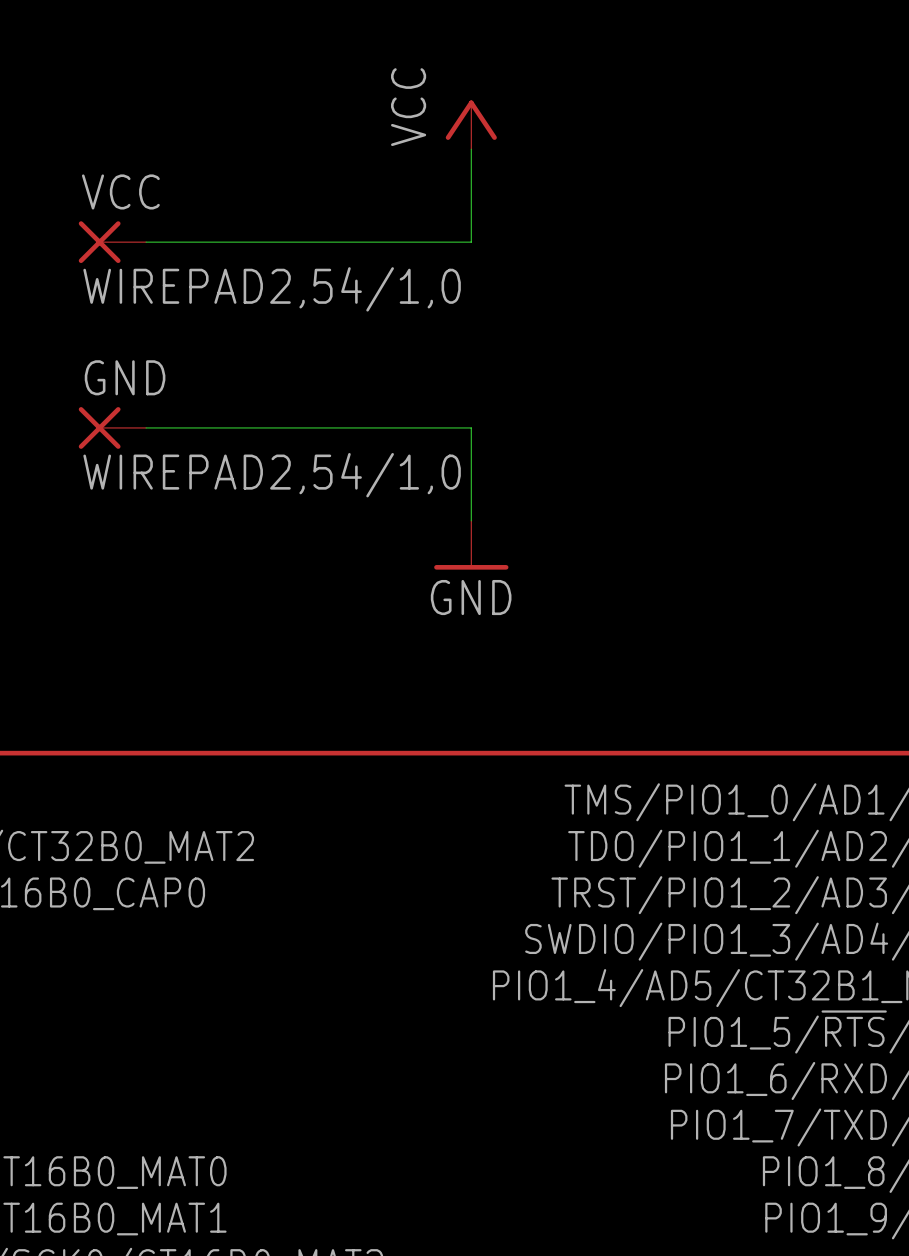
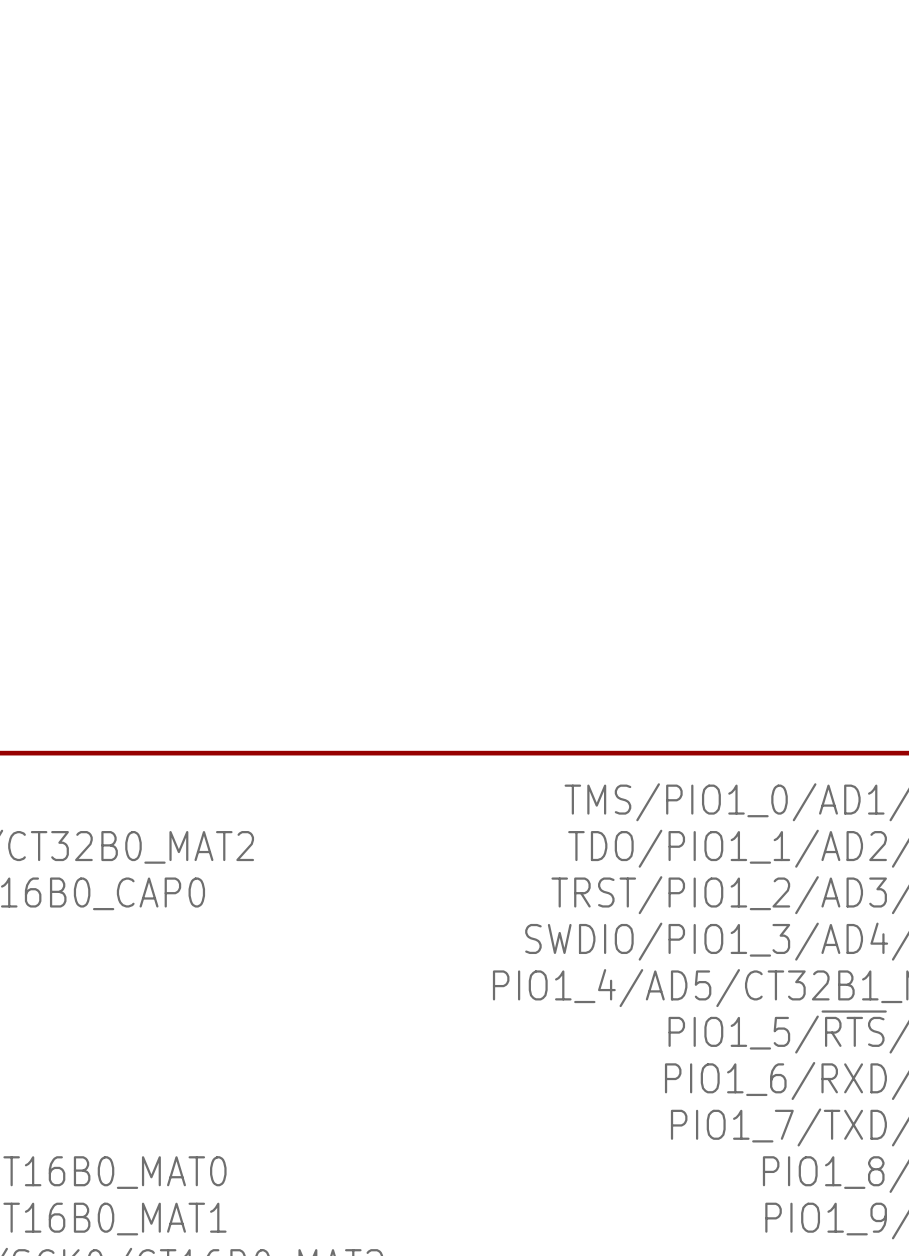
power symbol: VCC (471, 124) -> none
wire: (471, 149) (471, 242) (146, 242) -> none
VCC: WIREPAD2,54/1,0 (112, 242) -> none
GND: WIREPAD2,54/1,0 (112, 427) -> none
wire: (146, 427) (471, 427) (471, 520) -> none
power symbol: GND (471, 545) -> none

